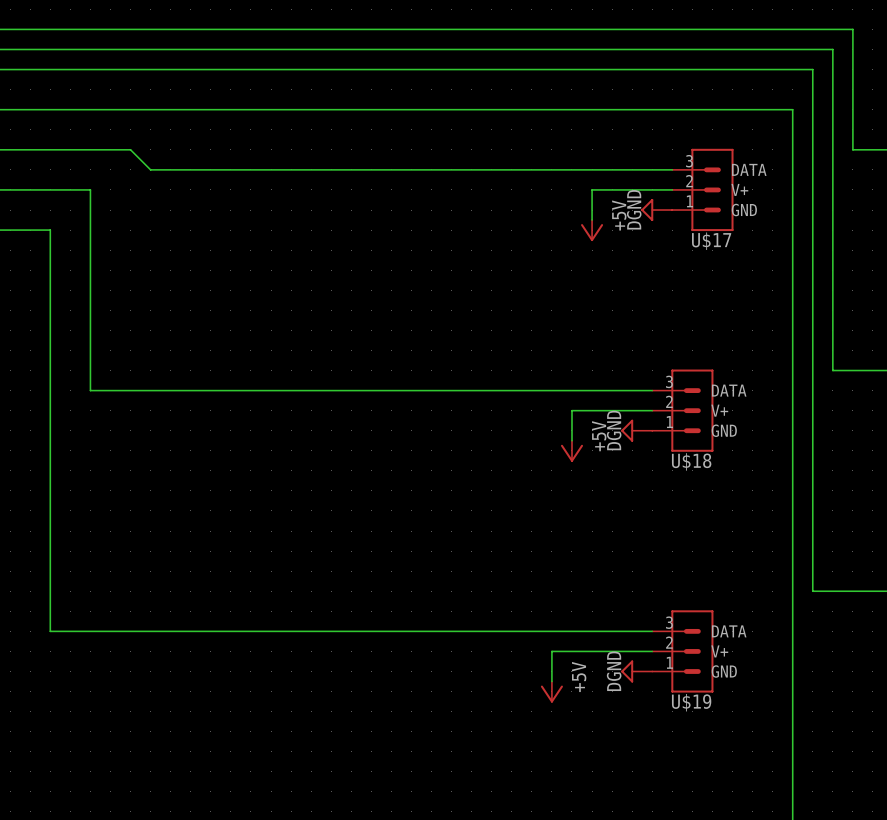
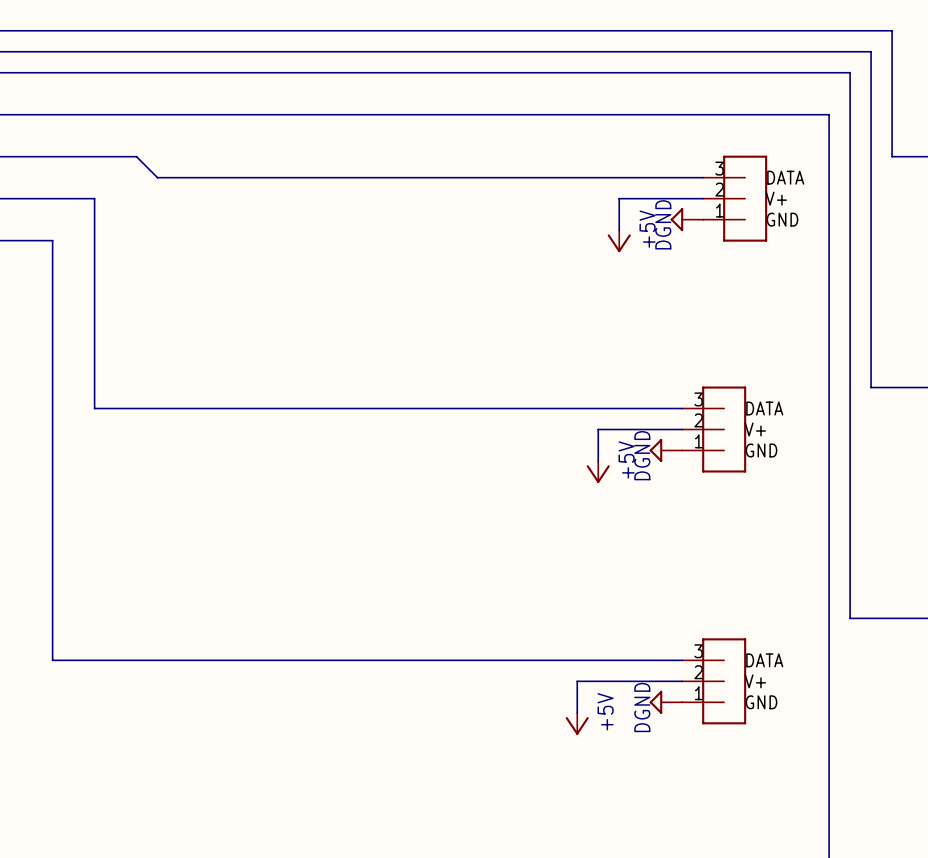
U$17: (702, 189) -> none
part: none -> (735, 198)
U$18: (682, 410) -> none
part: none -> (714, 429)
U$19: (682, 651) -> none
part: none -> (714, 681)

